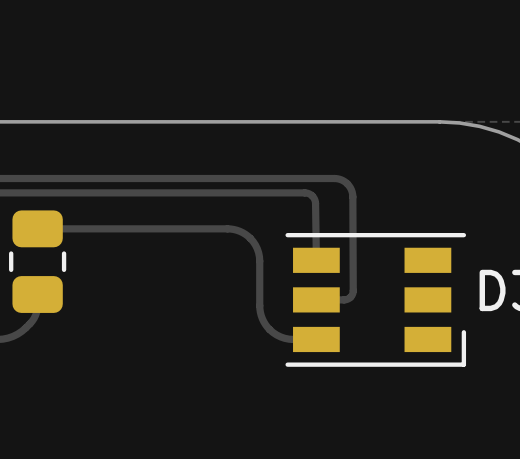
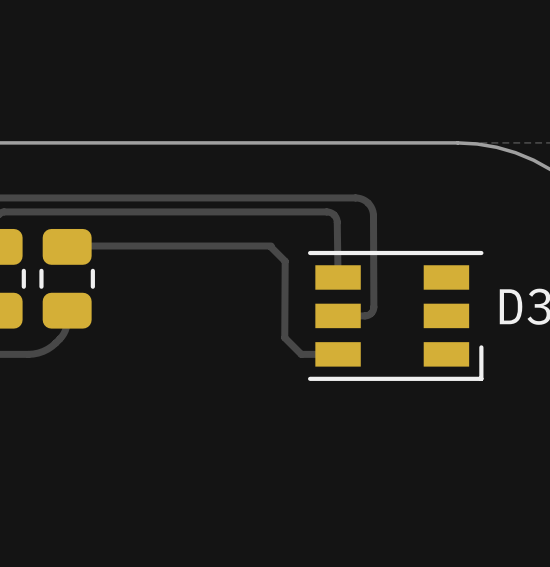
track: none -> (69, 246) (271, 246)
track: (37, 228) (227, 228) (239, 231) (250, 238) (258, 252) (259, 309) (263, 321) (276, 334) (293, 339) -> (270, 246) (285, 261) (284, 337) (301, 354) (315, 354)

